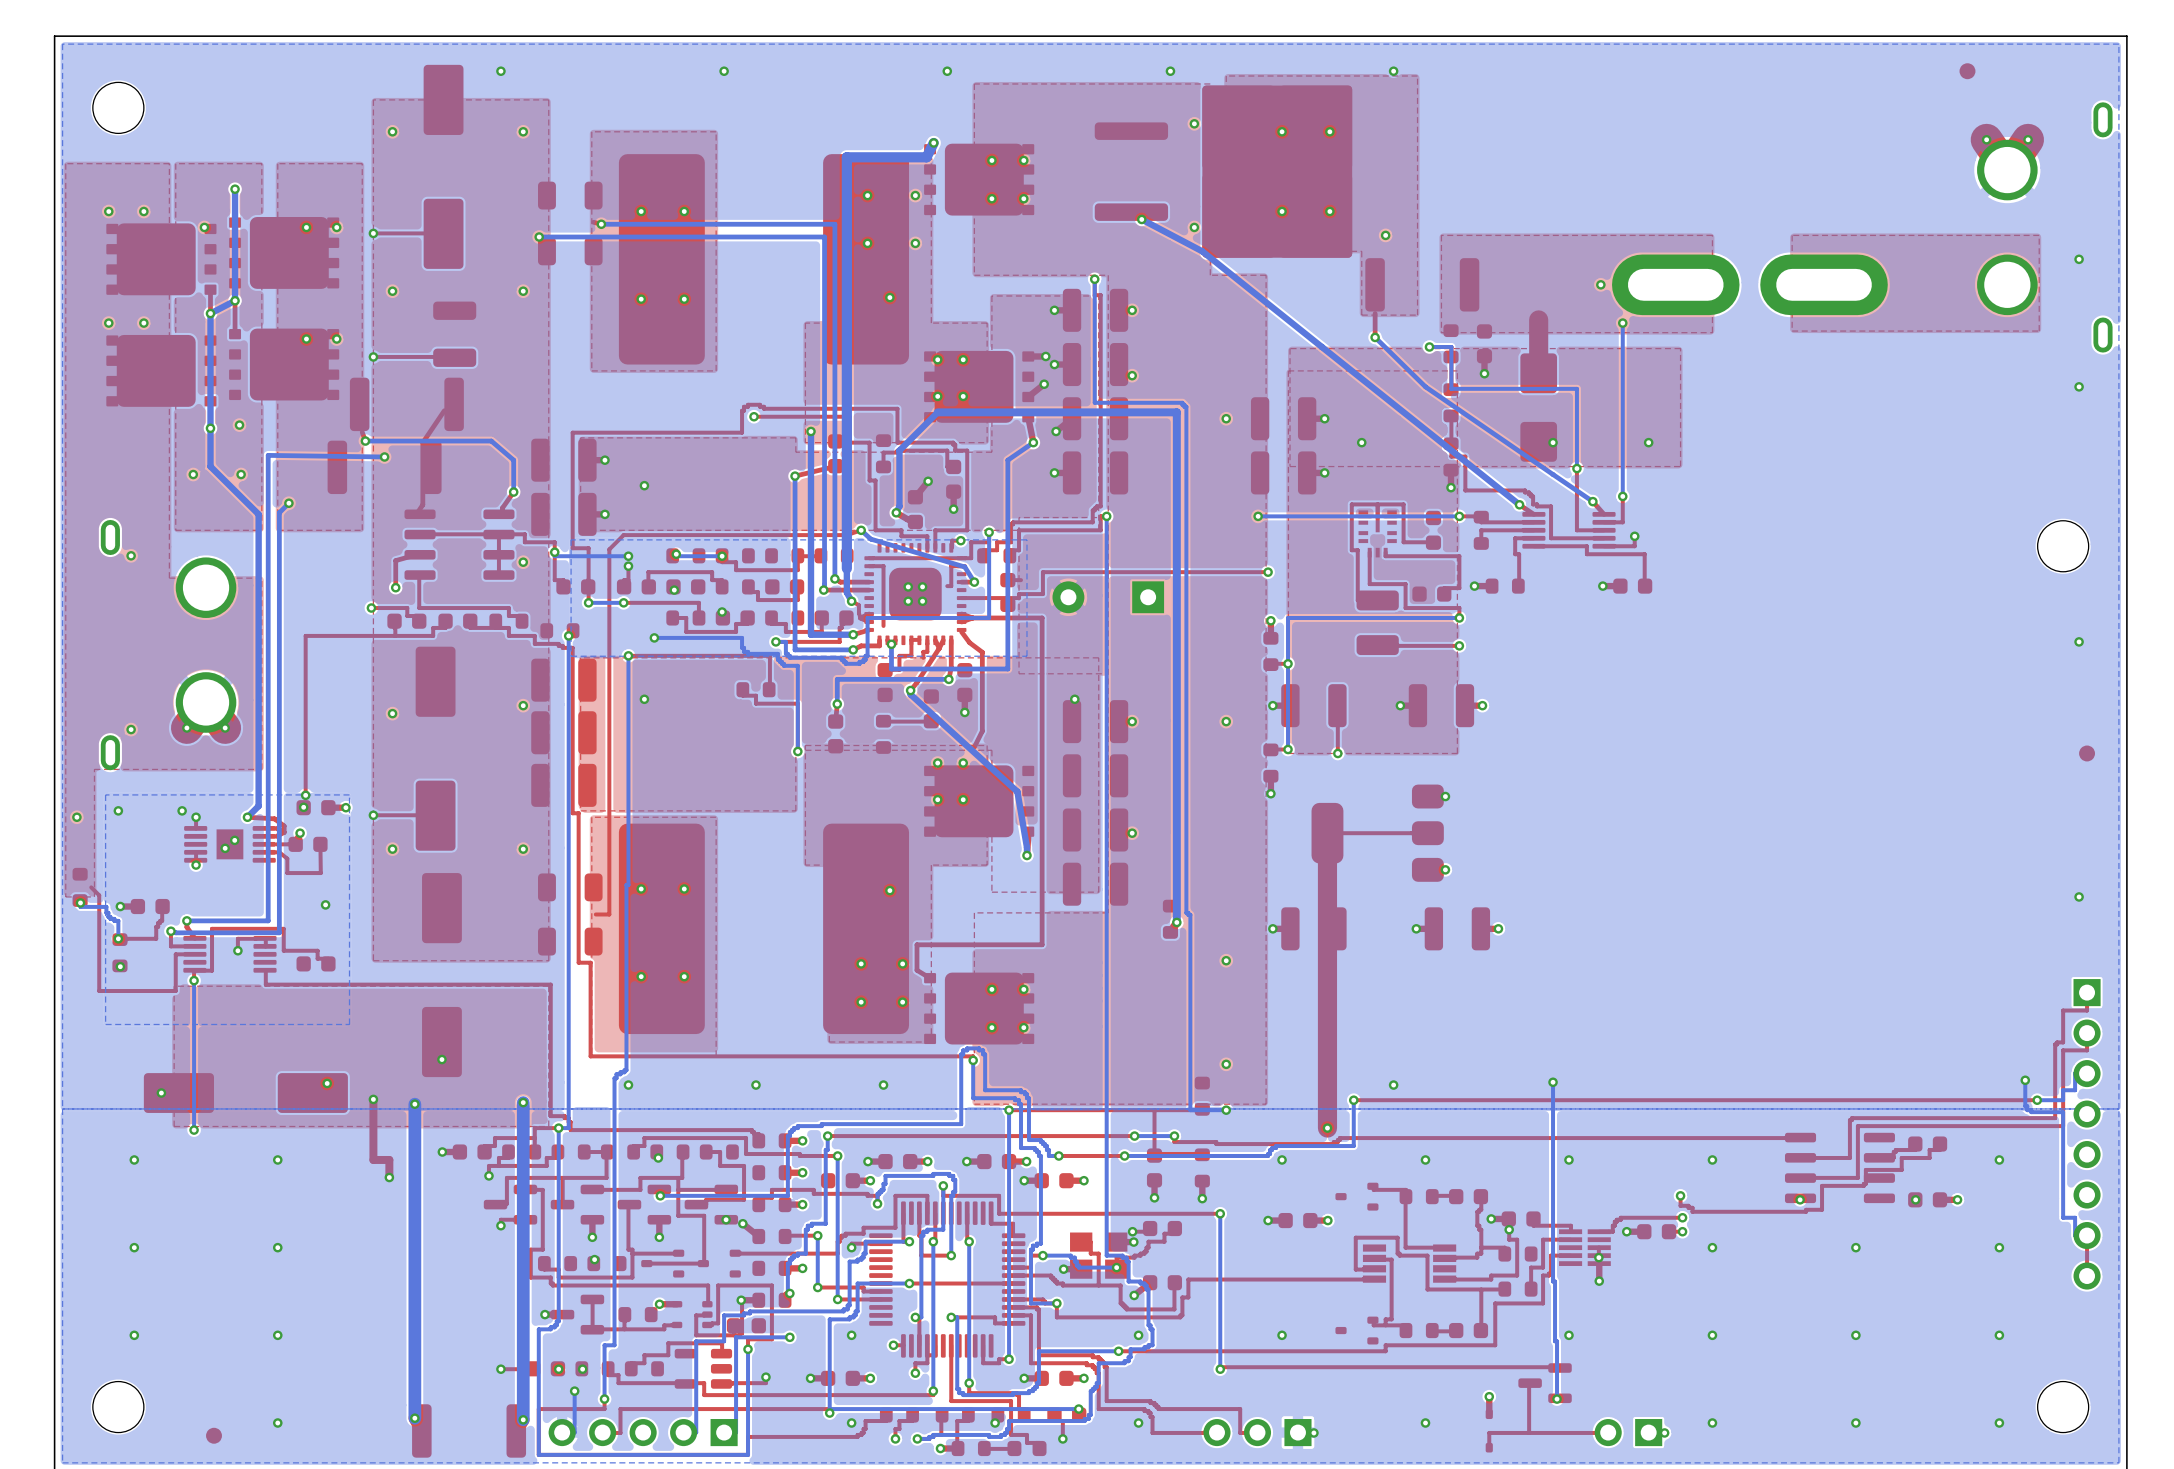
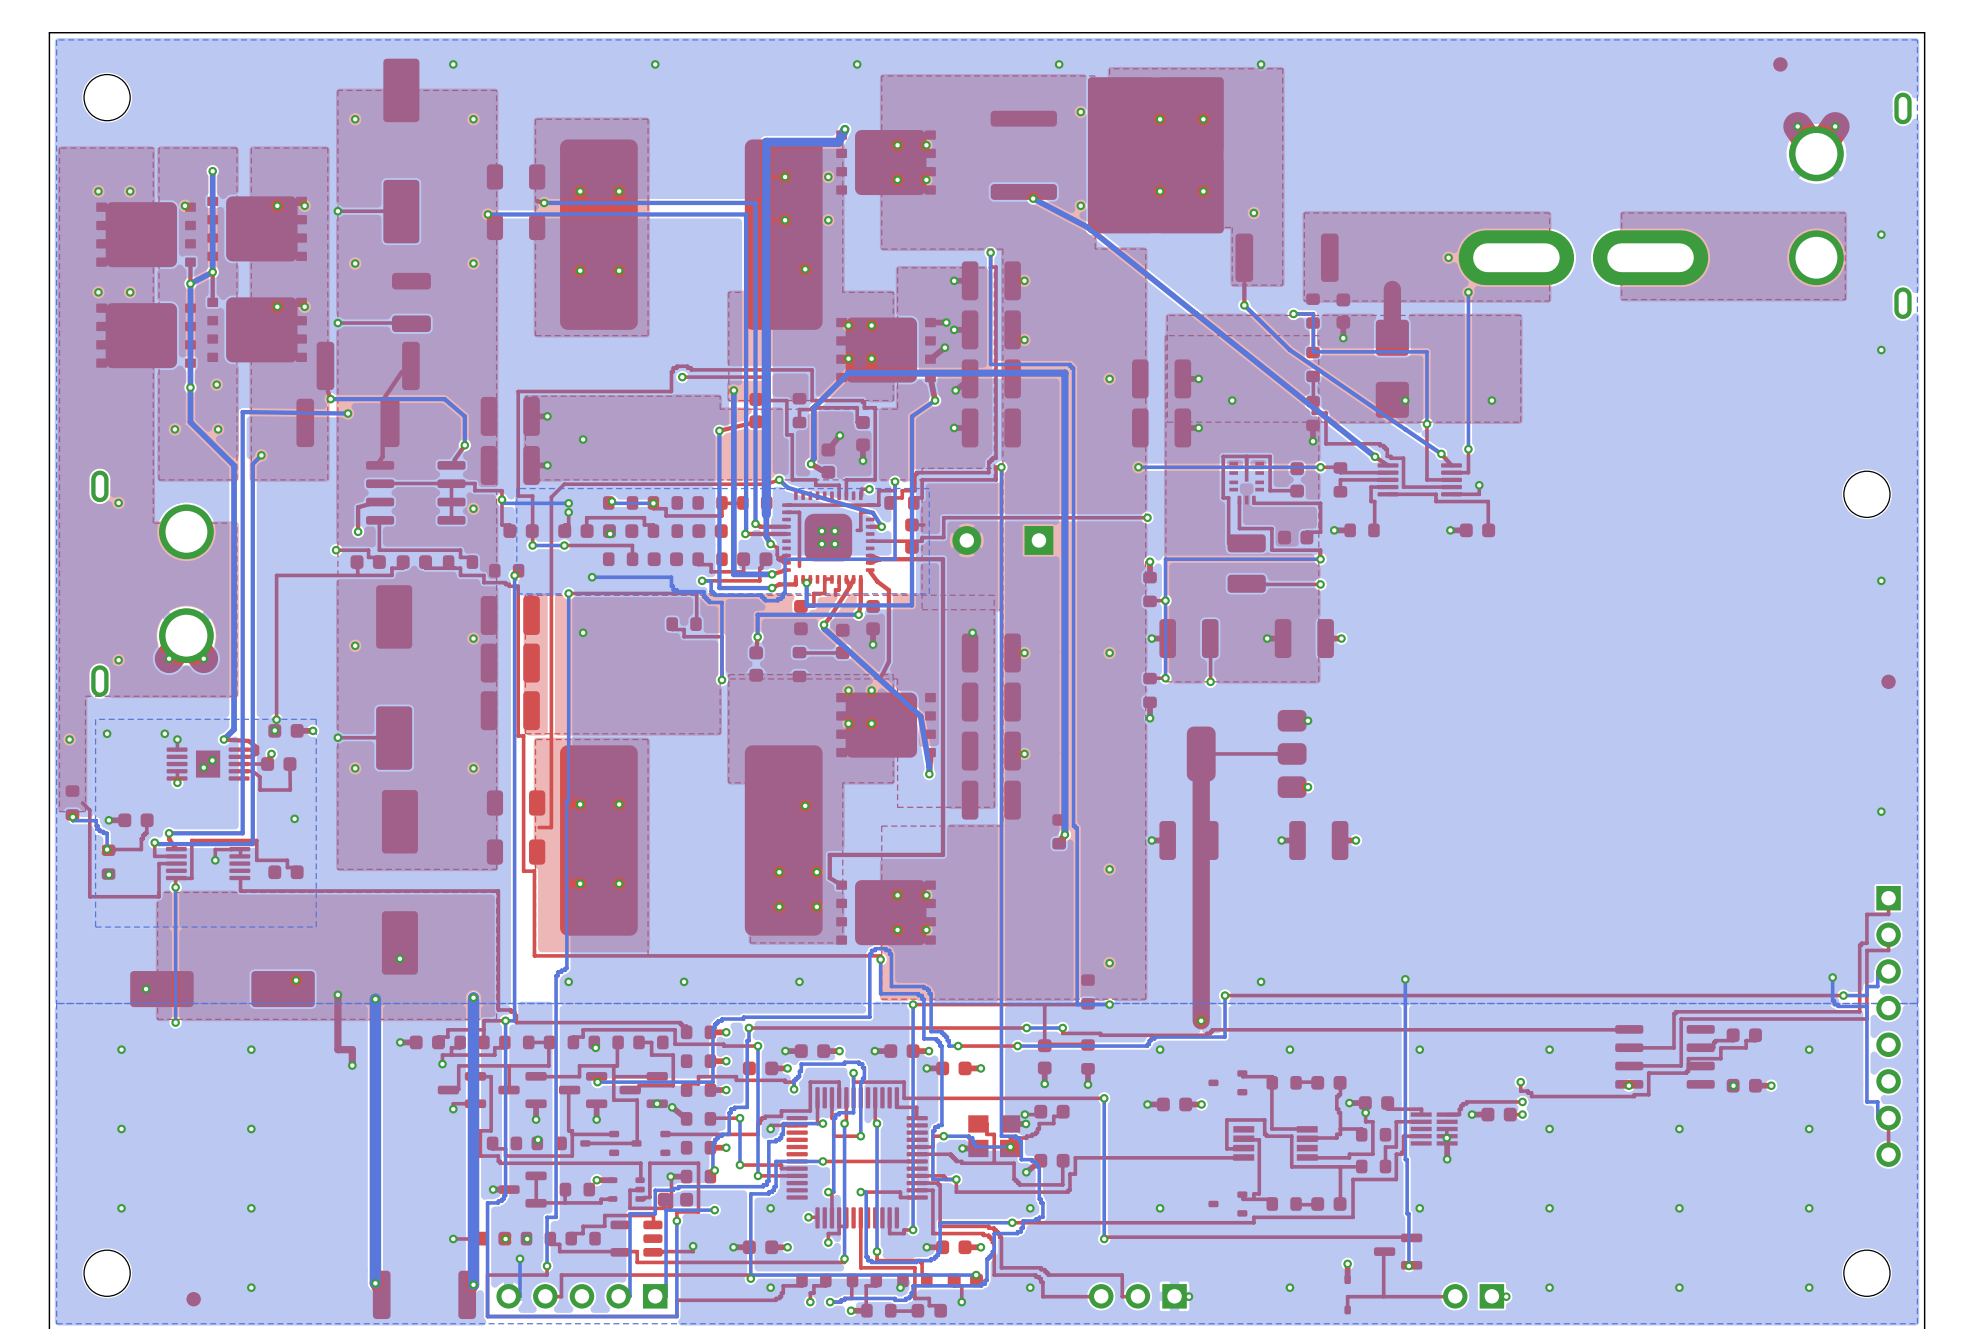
top track: (797, 586) (797, 600) (757, 600) (757, 592) (748, 592) (748, 586) -> none
via: (722, 612) -> none
top track: (747, 617) (747, 623) (736, 623) (736, 631) (686, 631) (686, 617) (672, 617) -> none

